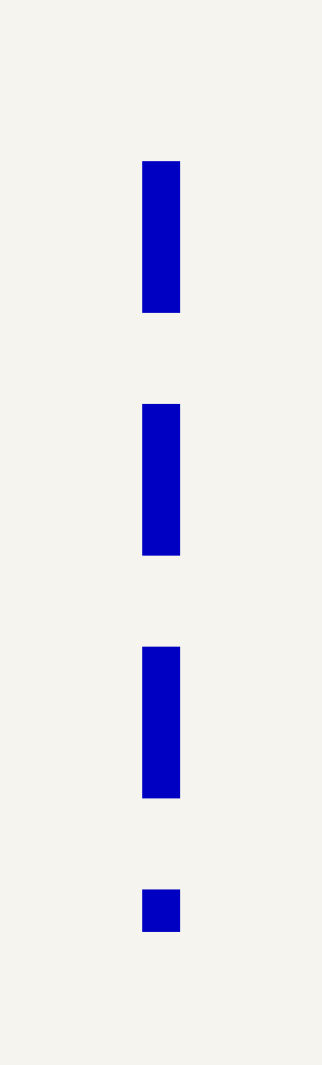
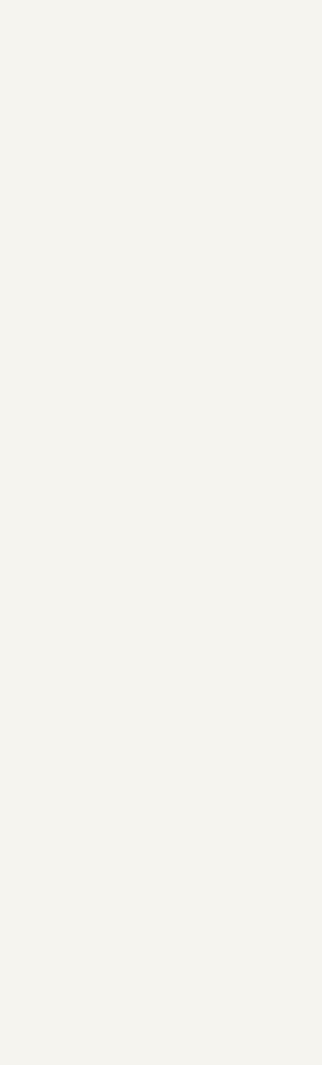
line: (161, 161) (161, 931) -> none

